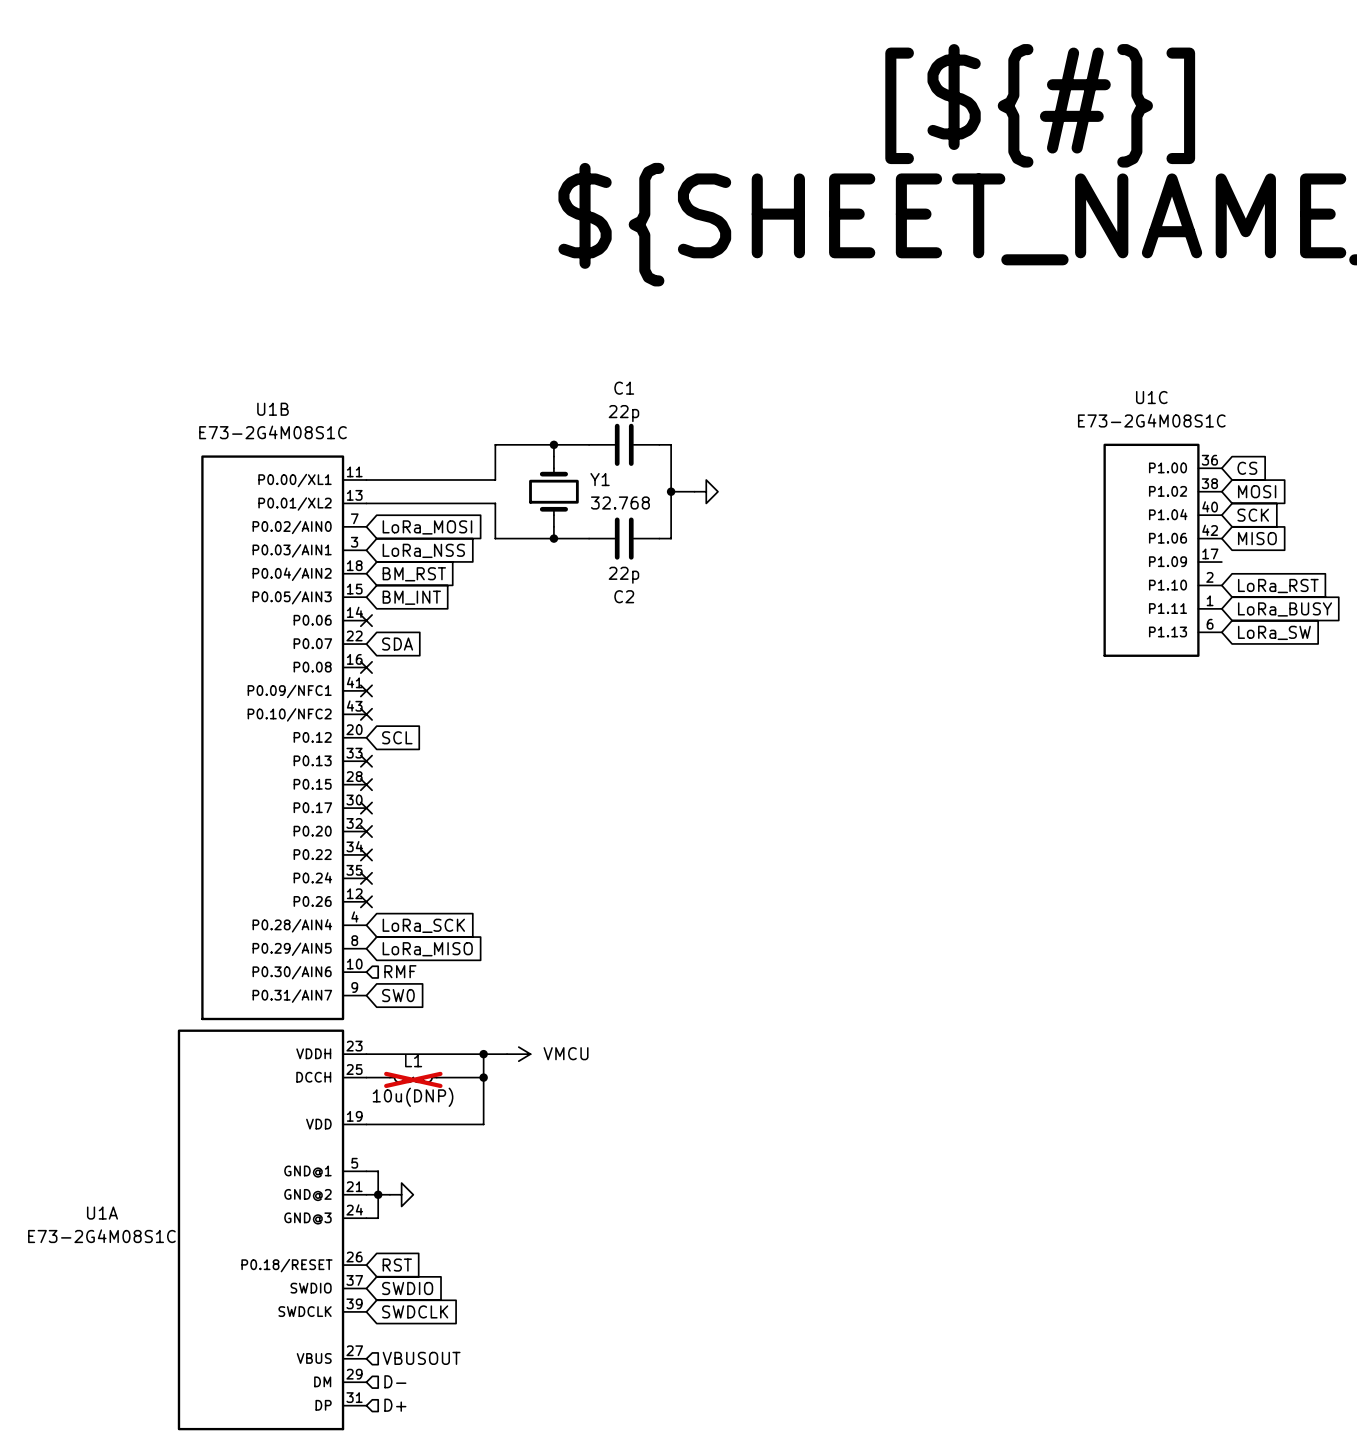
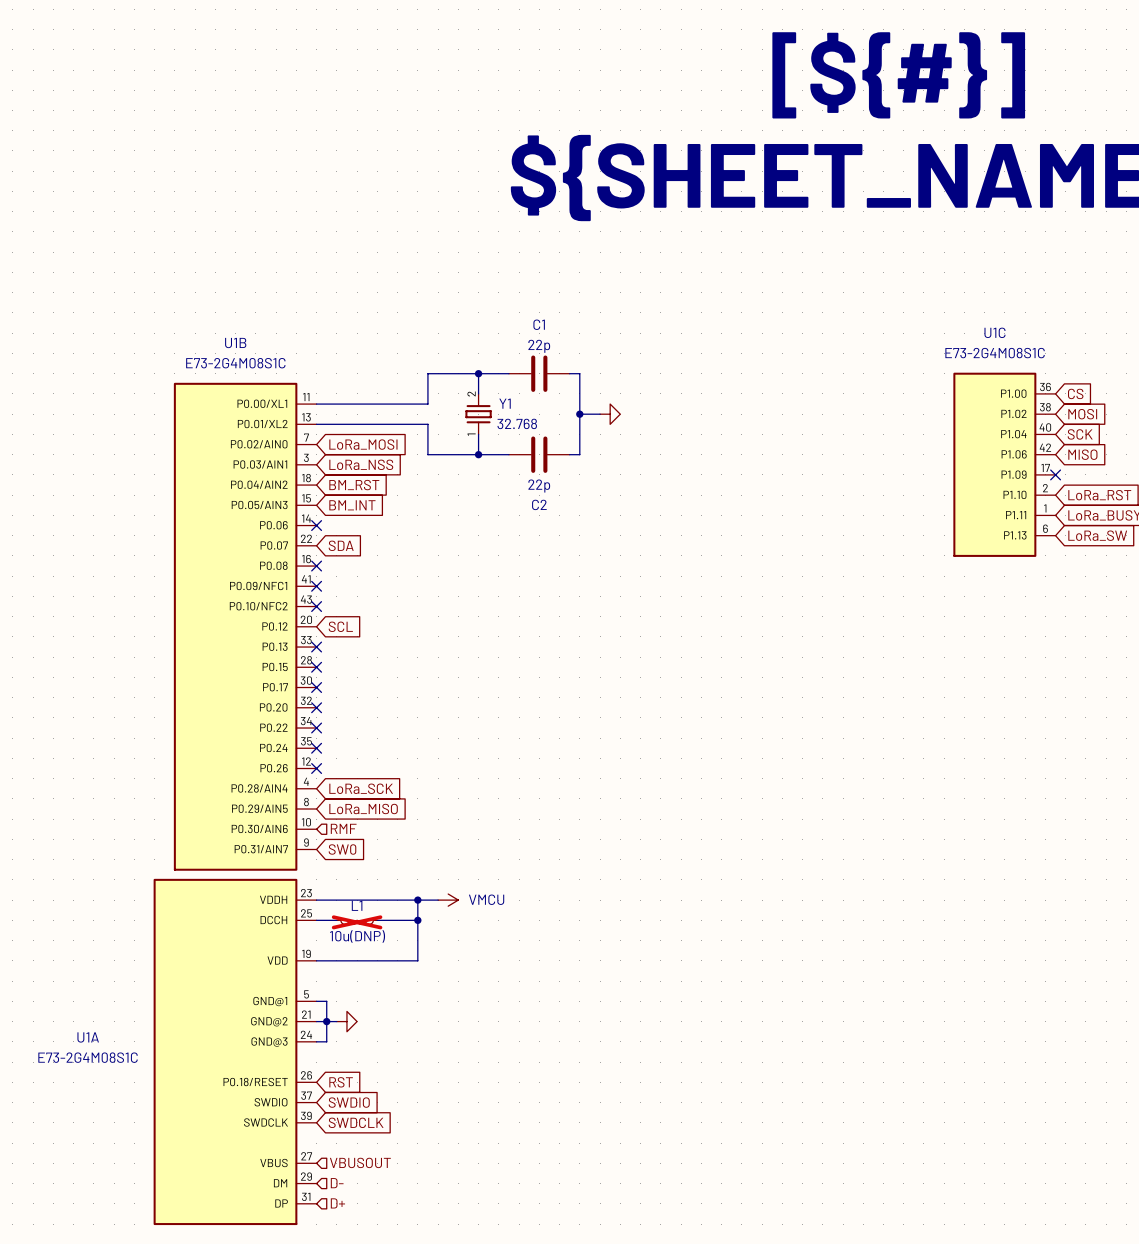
Y1 symbol: [529, 456, 579, 527] -> [465, 393, 492, 436]
no-connect mark: none -> (1055, 474)

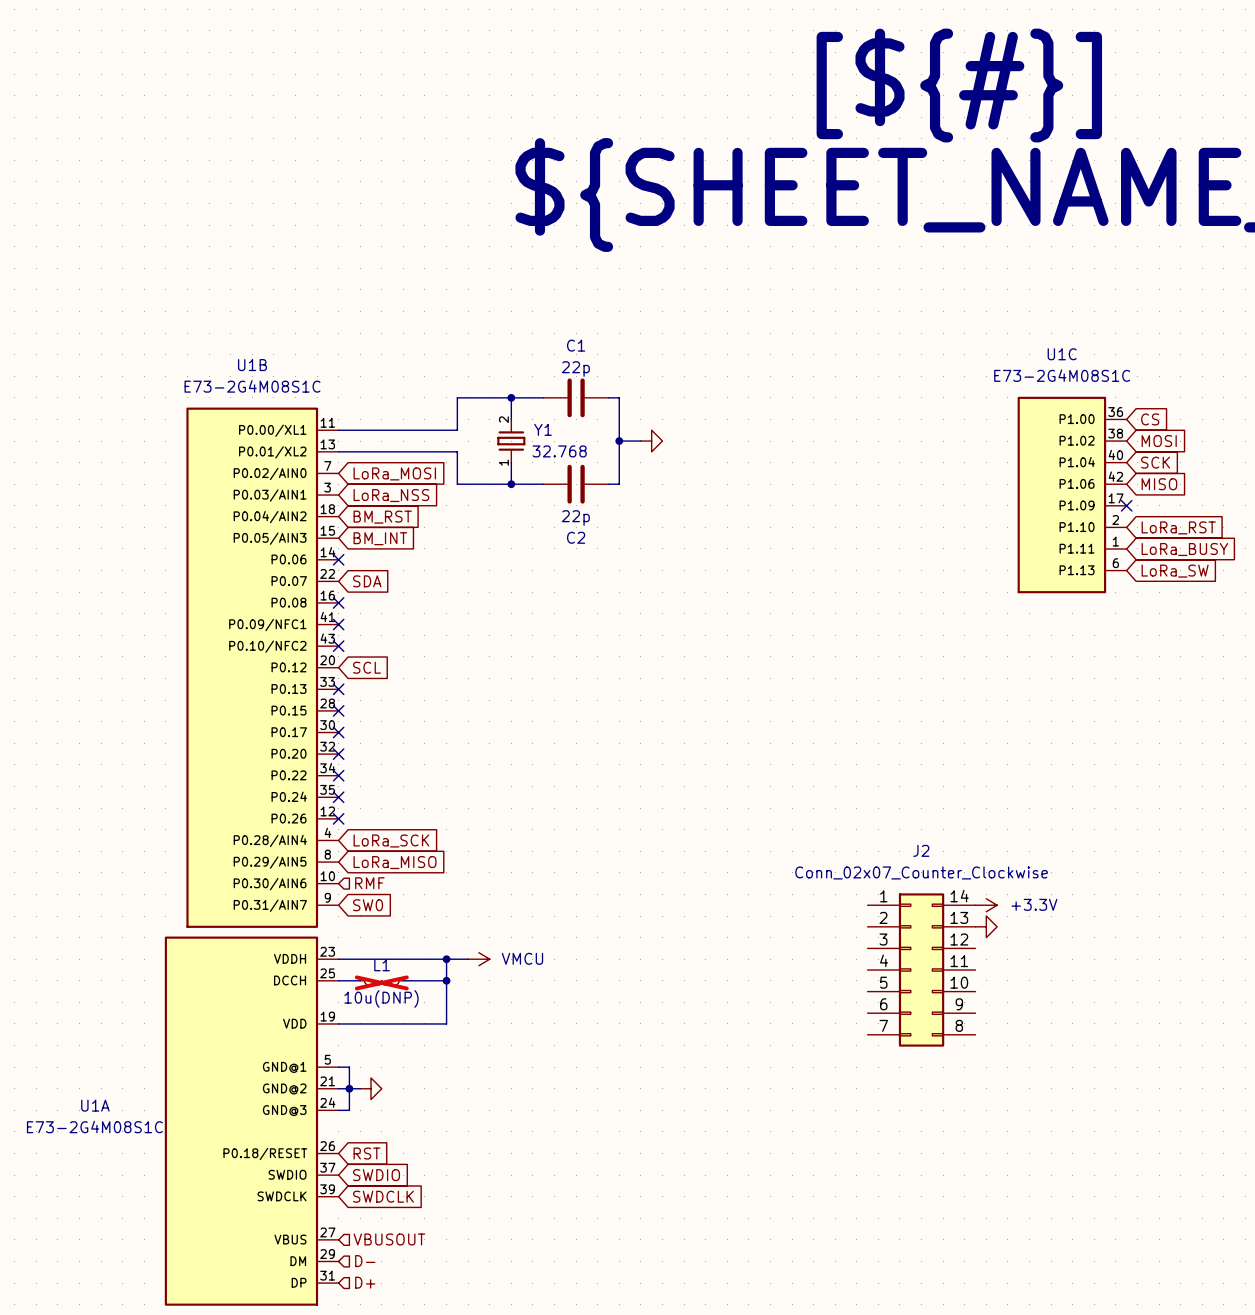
power symbol: none -> +3.3V (986, 905)
power symbol: none -> (986, 926)
J2: none -> Conn_02x07_Counter_Clockwise (921, 970)

